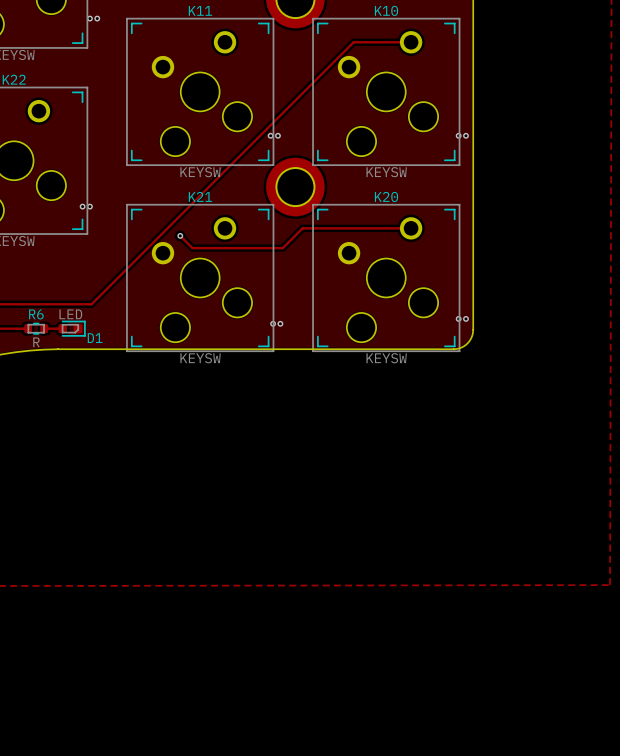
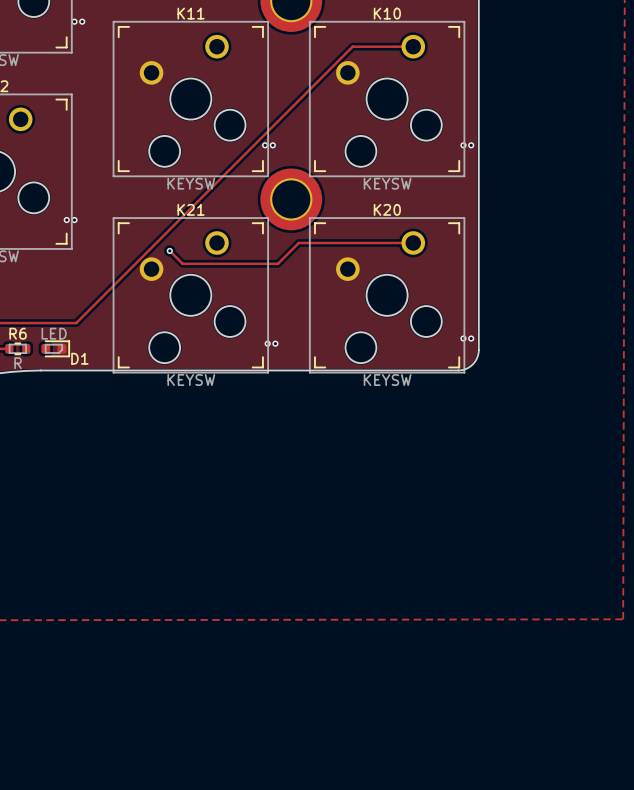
track: (44, 328) (62, 328) -> none

